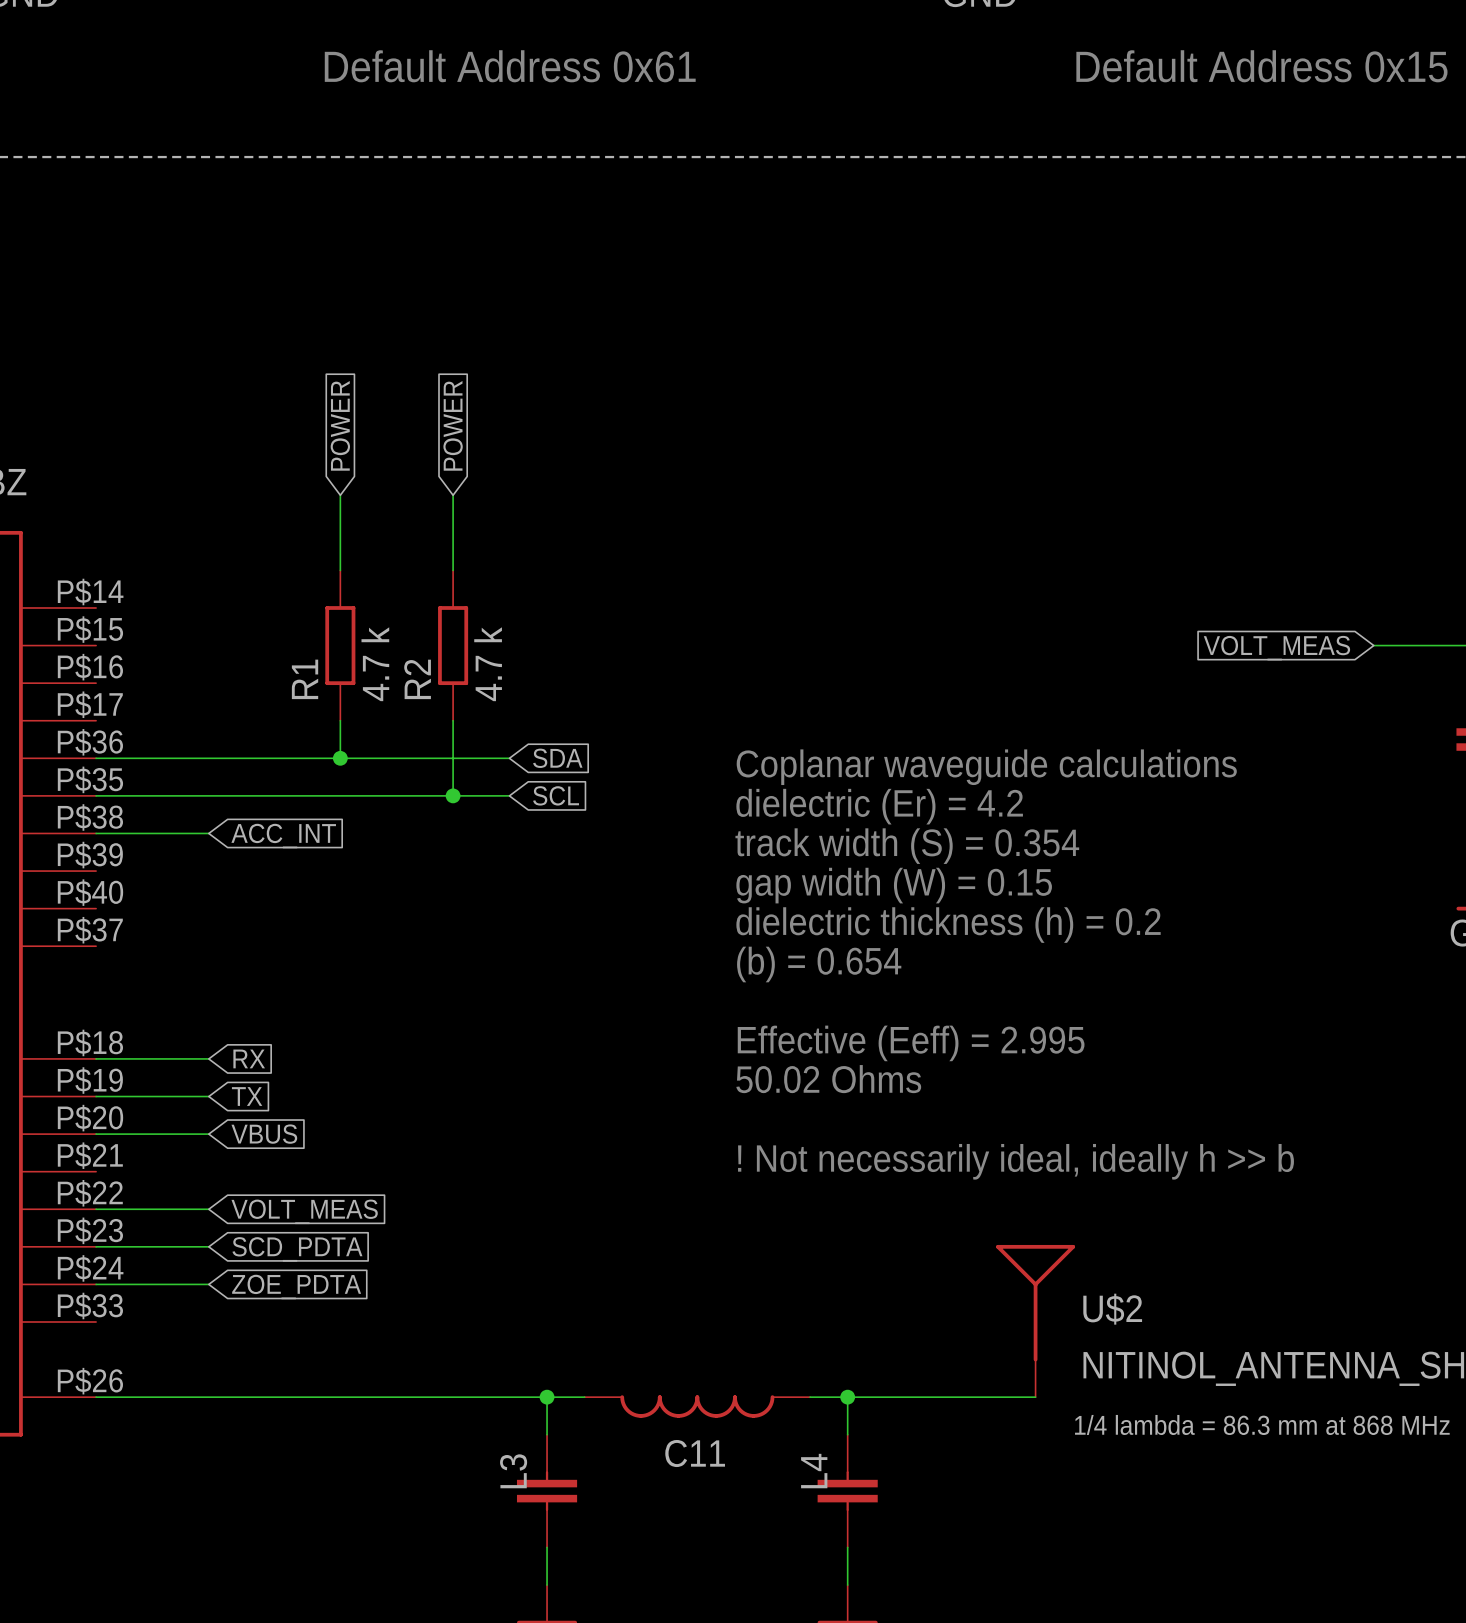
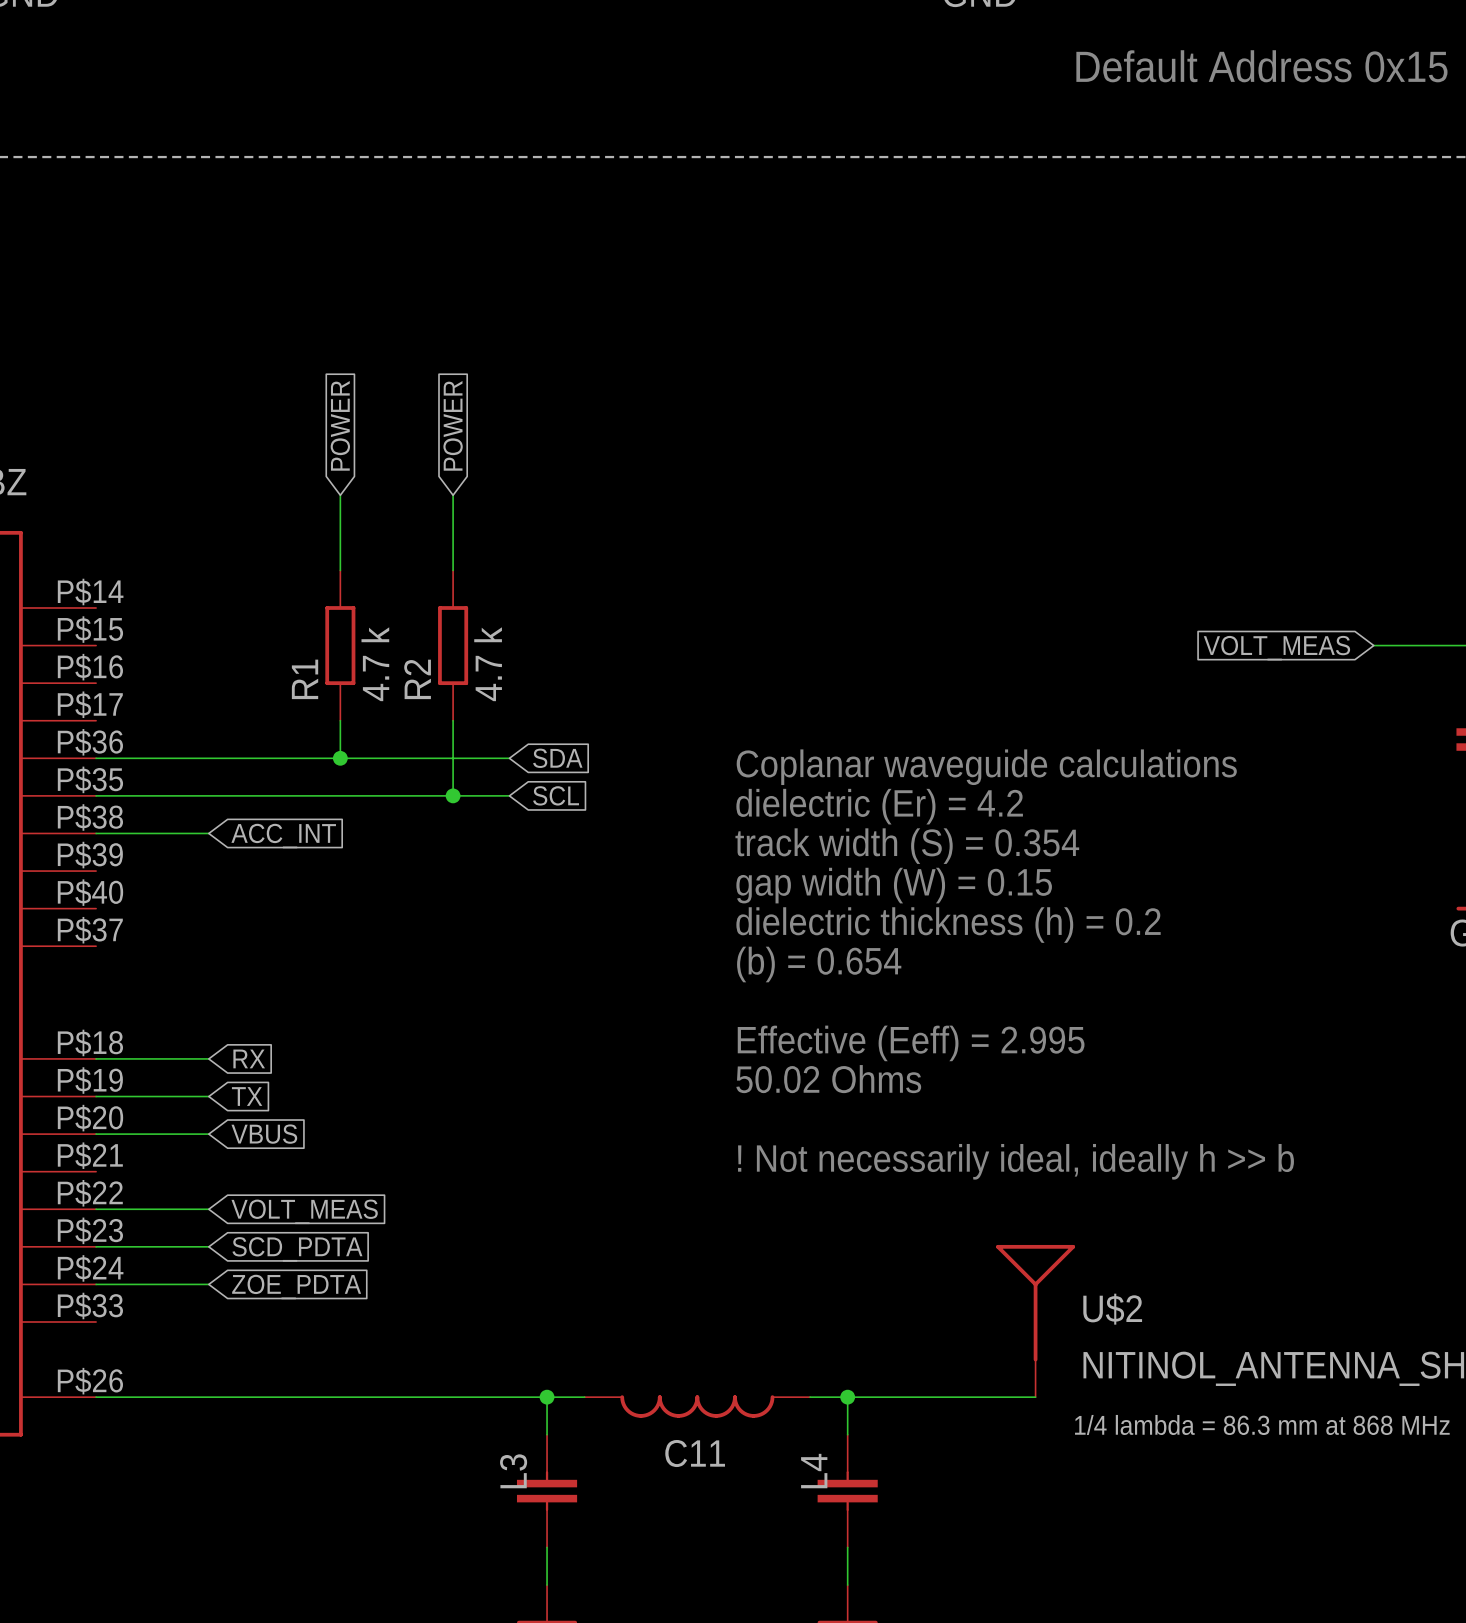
text: Default Address 0x61 (510, 66) -> none

